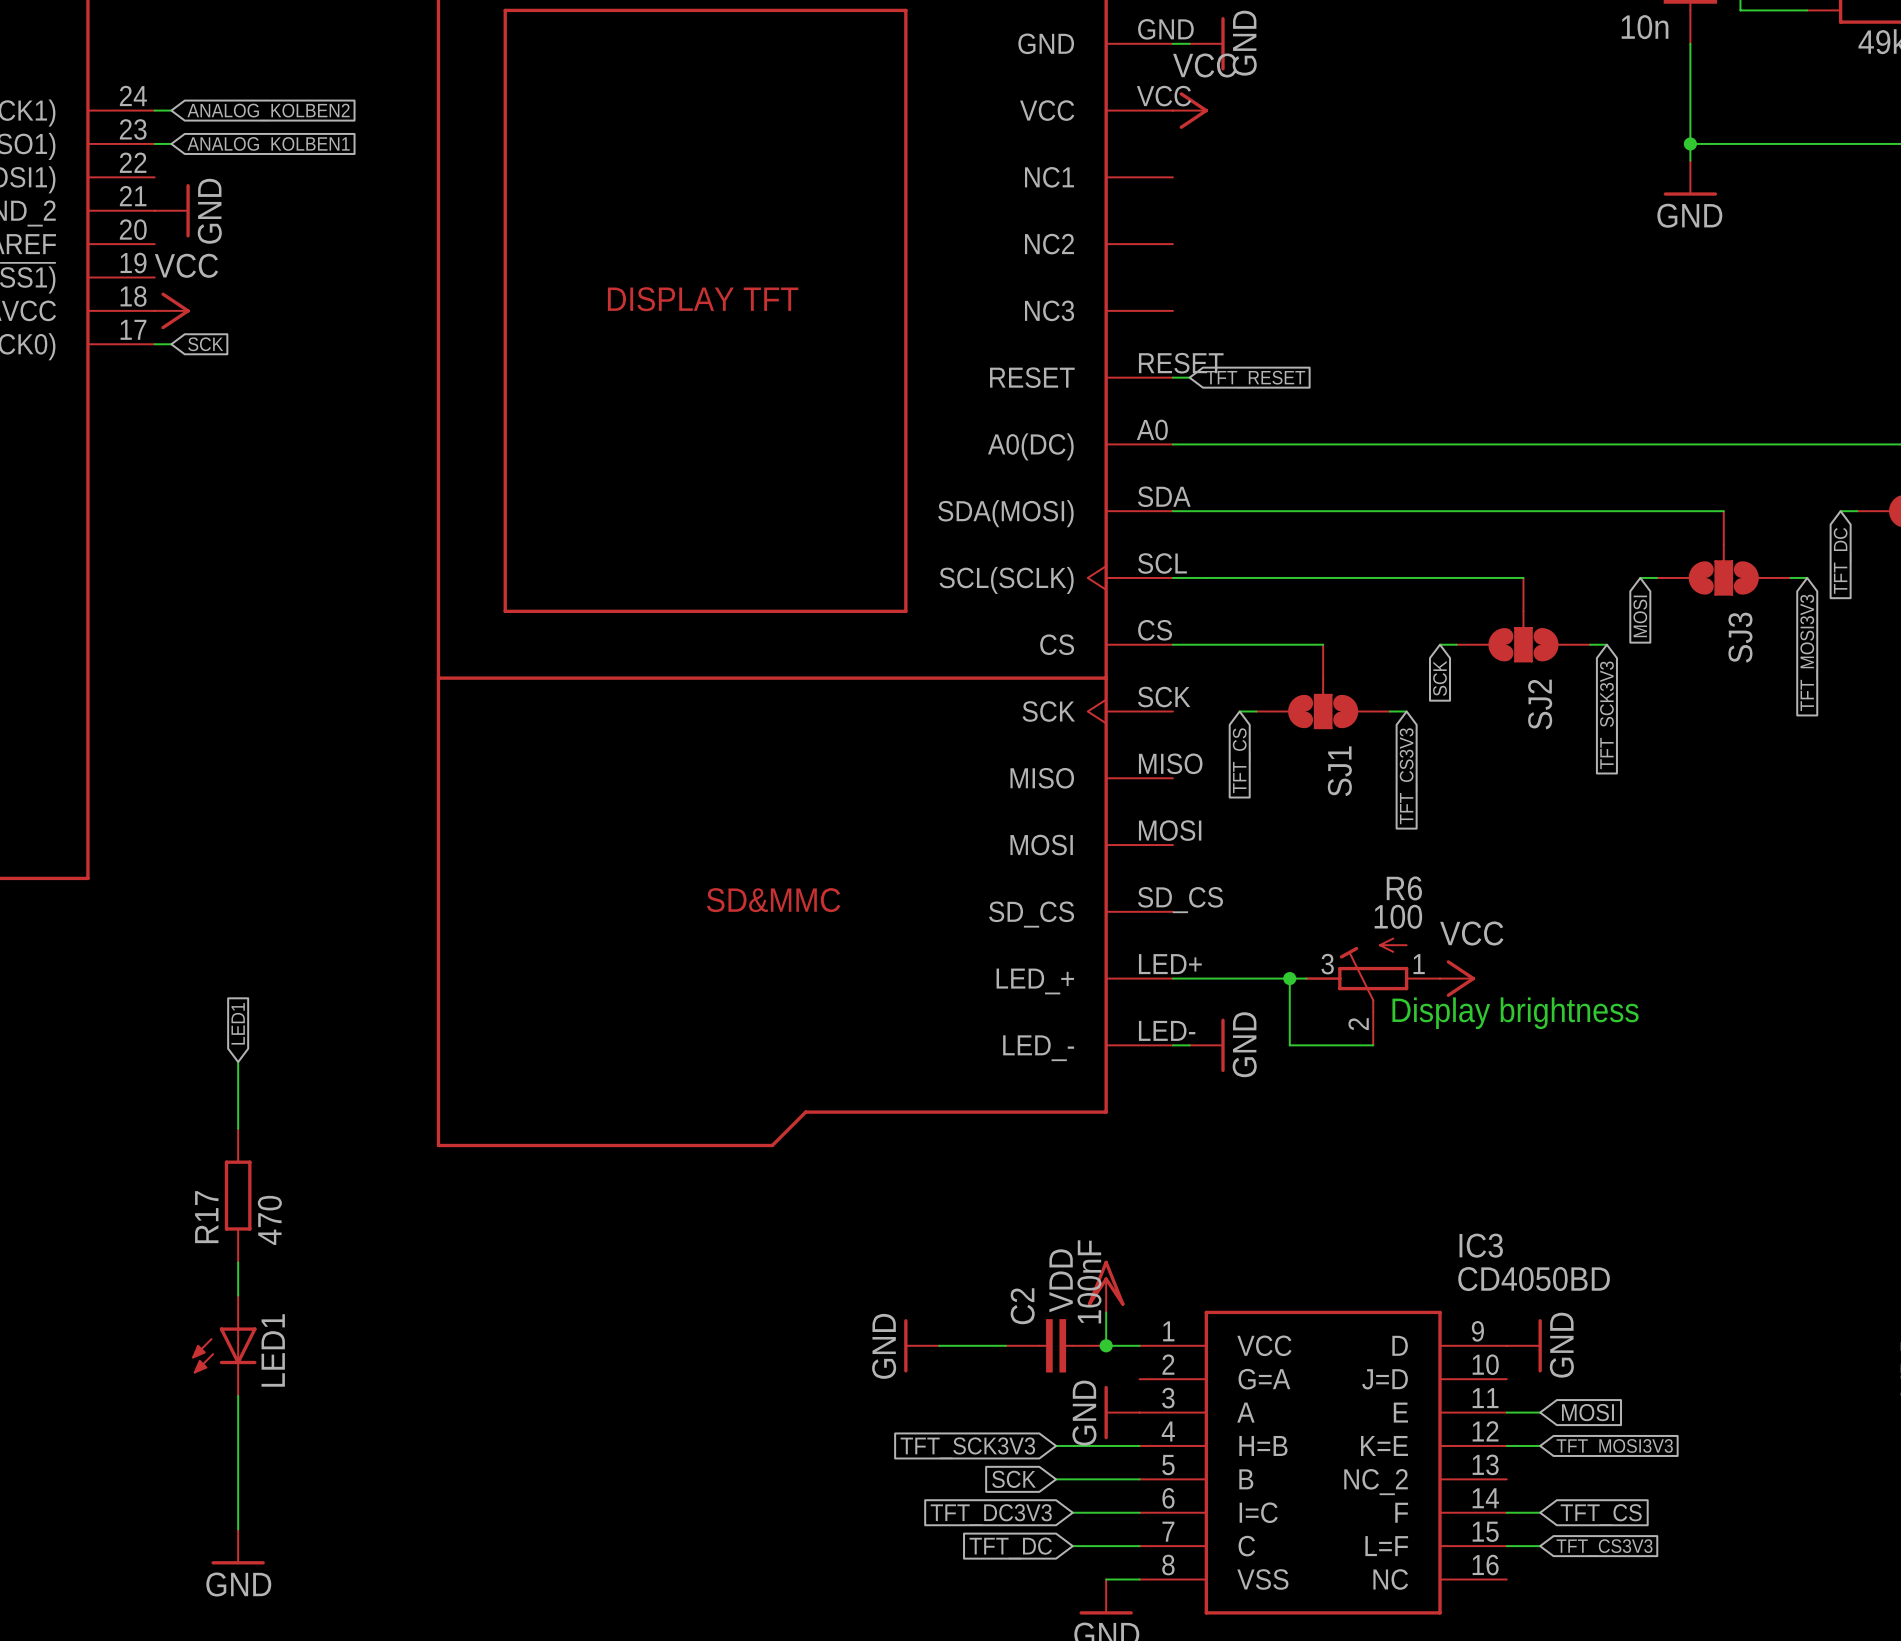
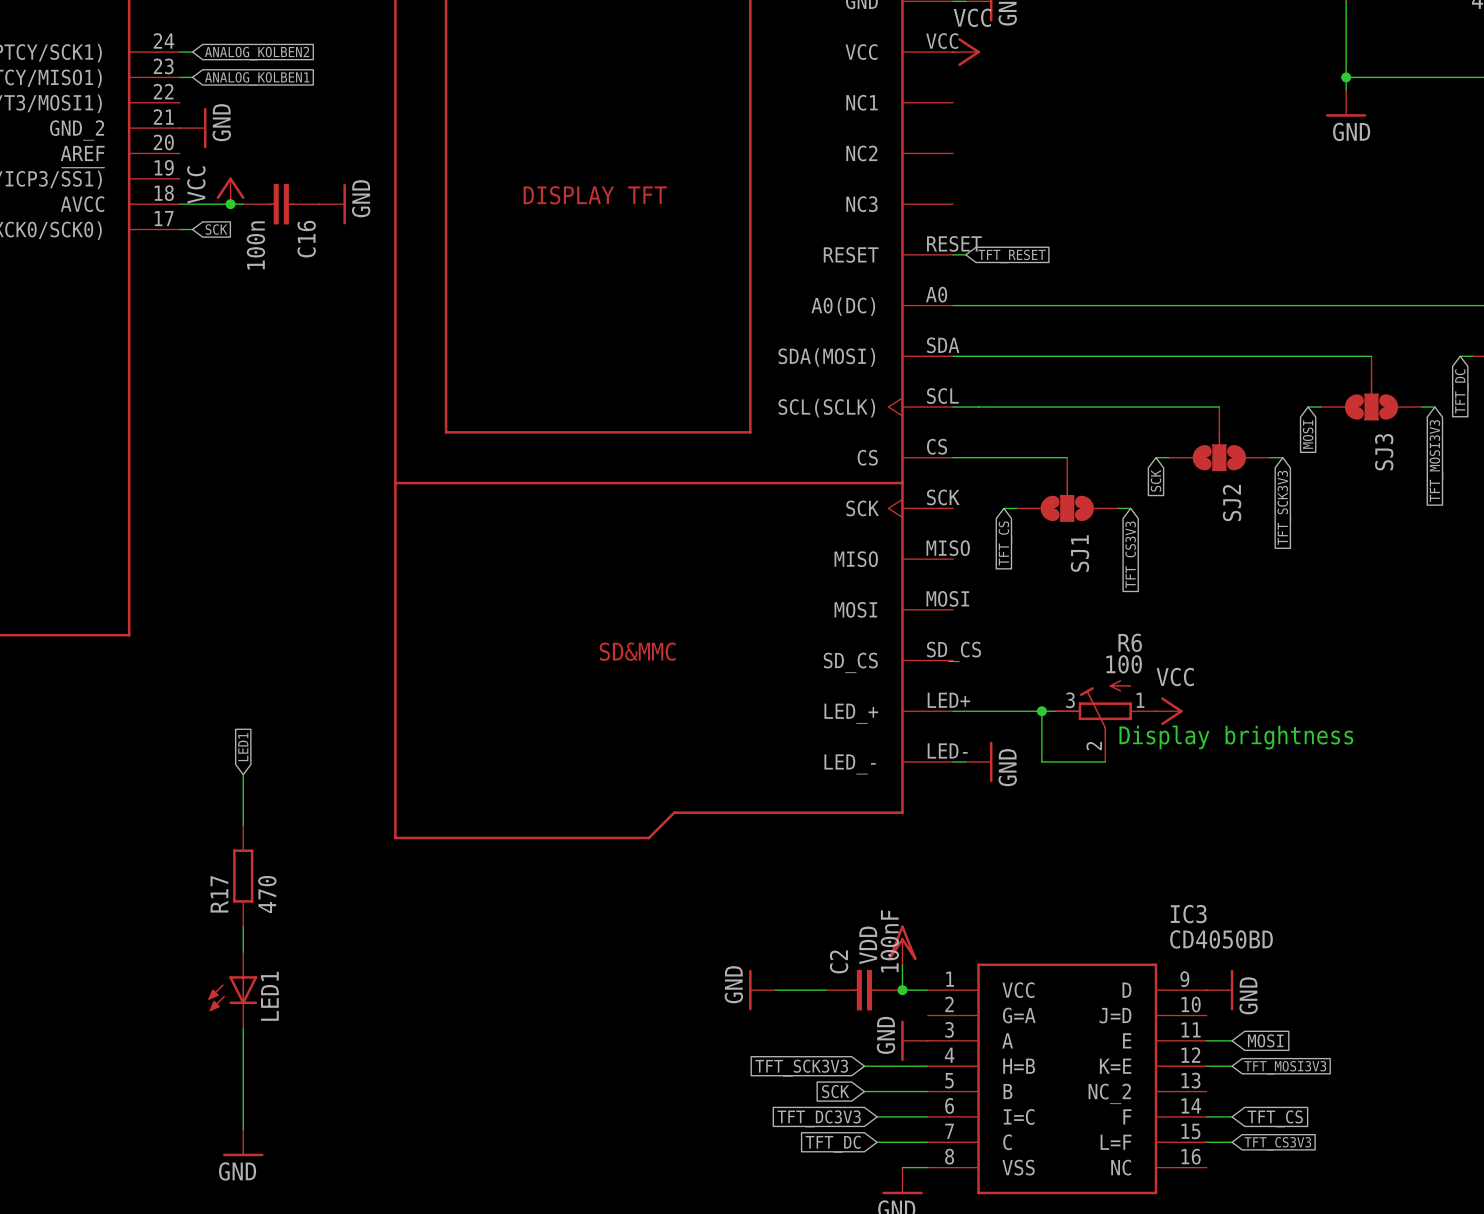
wire: none -> (179, 204) (243, 204)
power symbol position: VCC (172, 310) -> VCC (230, 190)
power symbol rotation: 0° (175, 310) -> 90° counterclockwise (230, 188)
junction: none -> (230, 204)
C16: none -> 100n (281, 204)
power symbol: none -> GND (332, 204)

